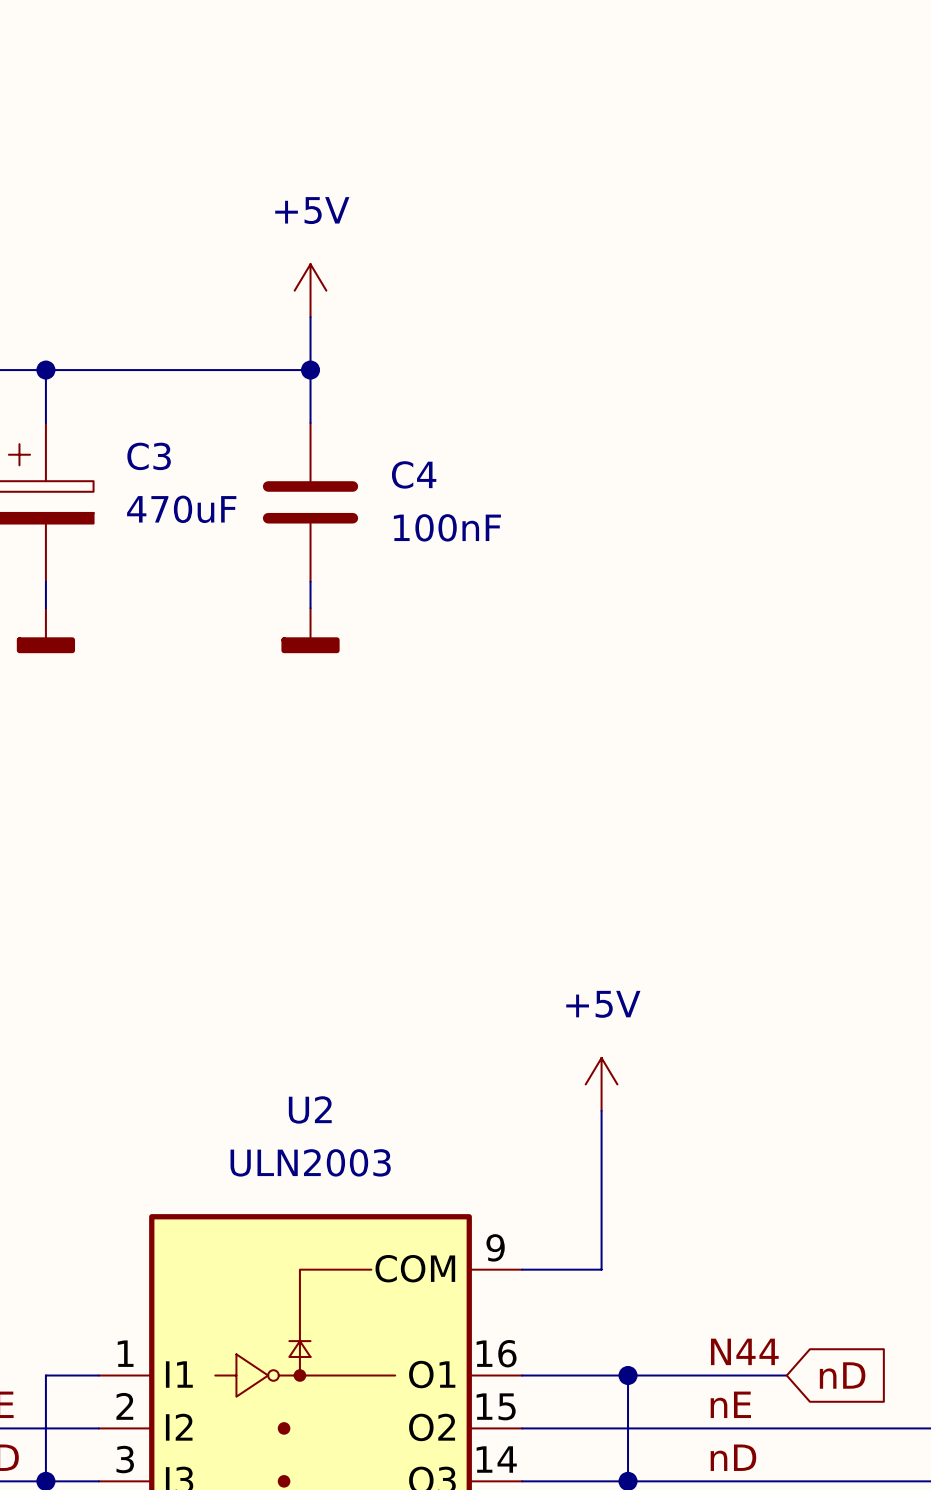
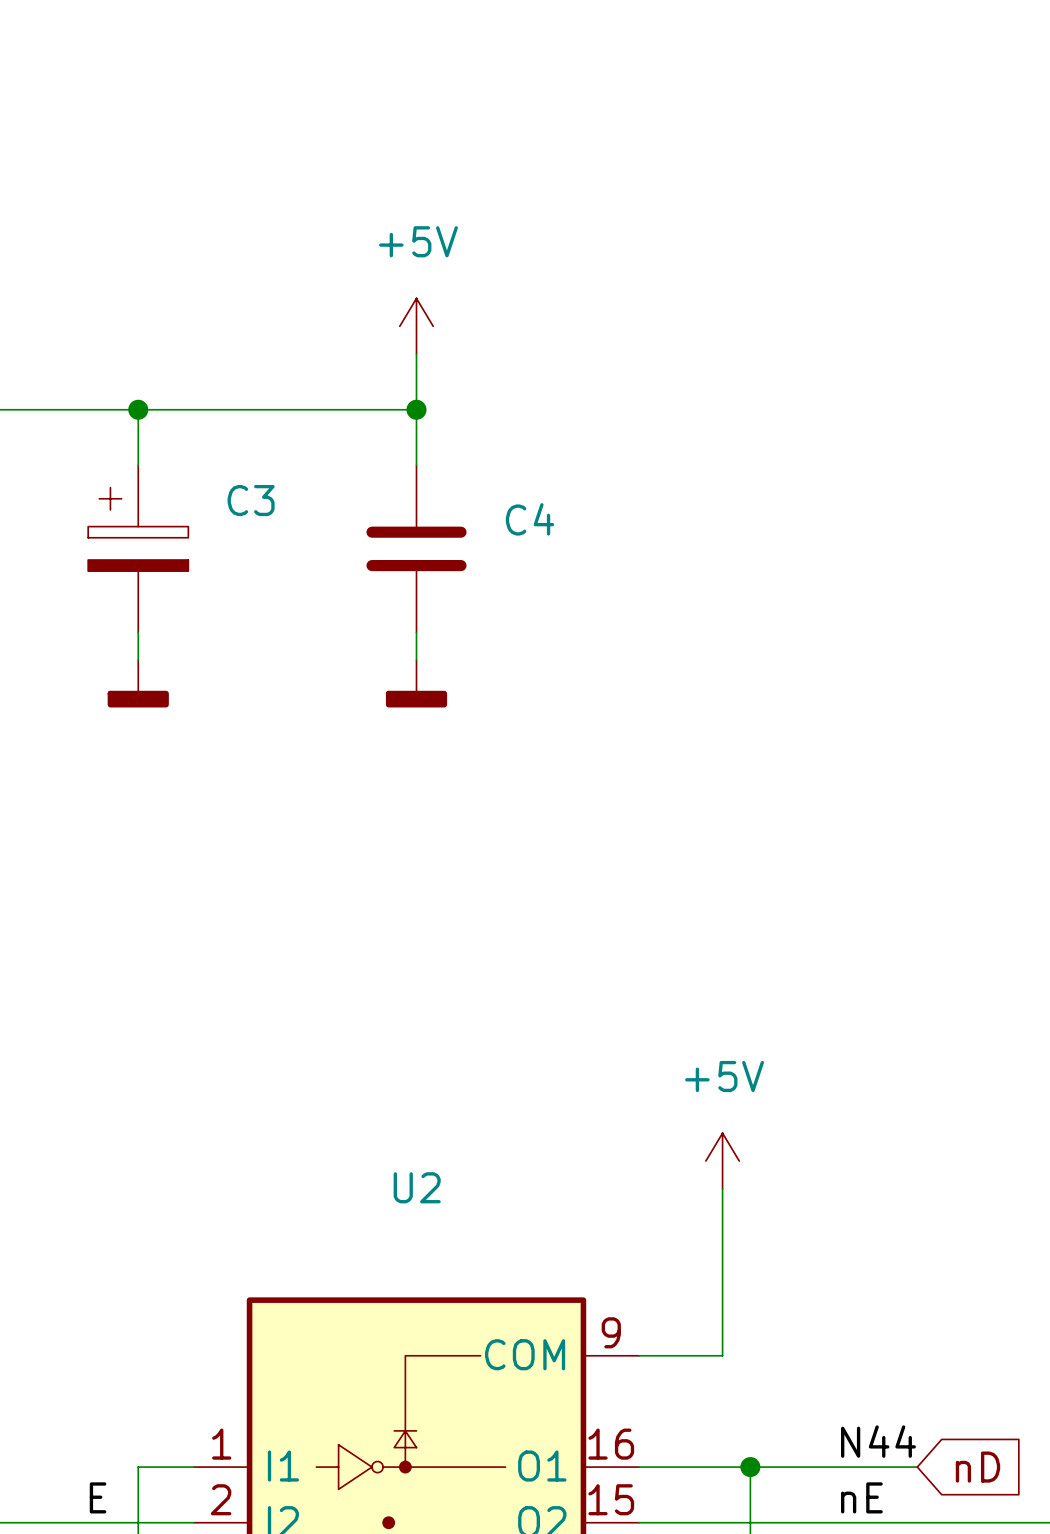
C3 value: 470uF (181, 509) -> none
C4 value: 100nF (447, 527) -> none
U2 value: ULN2003 (310, 1162) -> none

